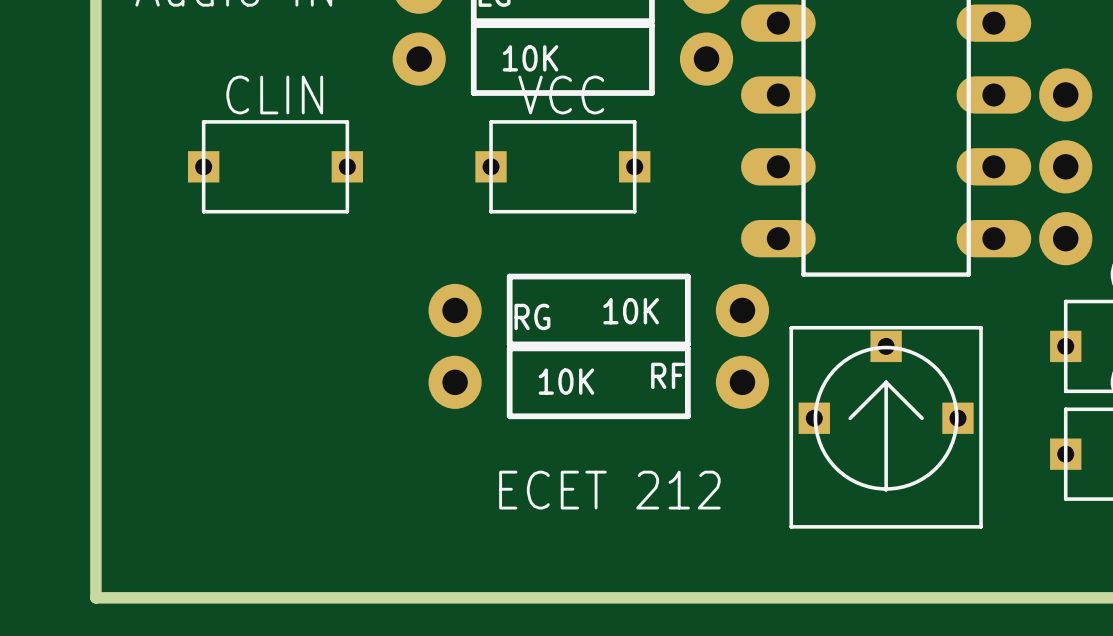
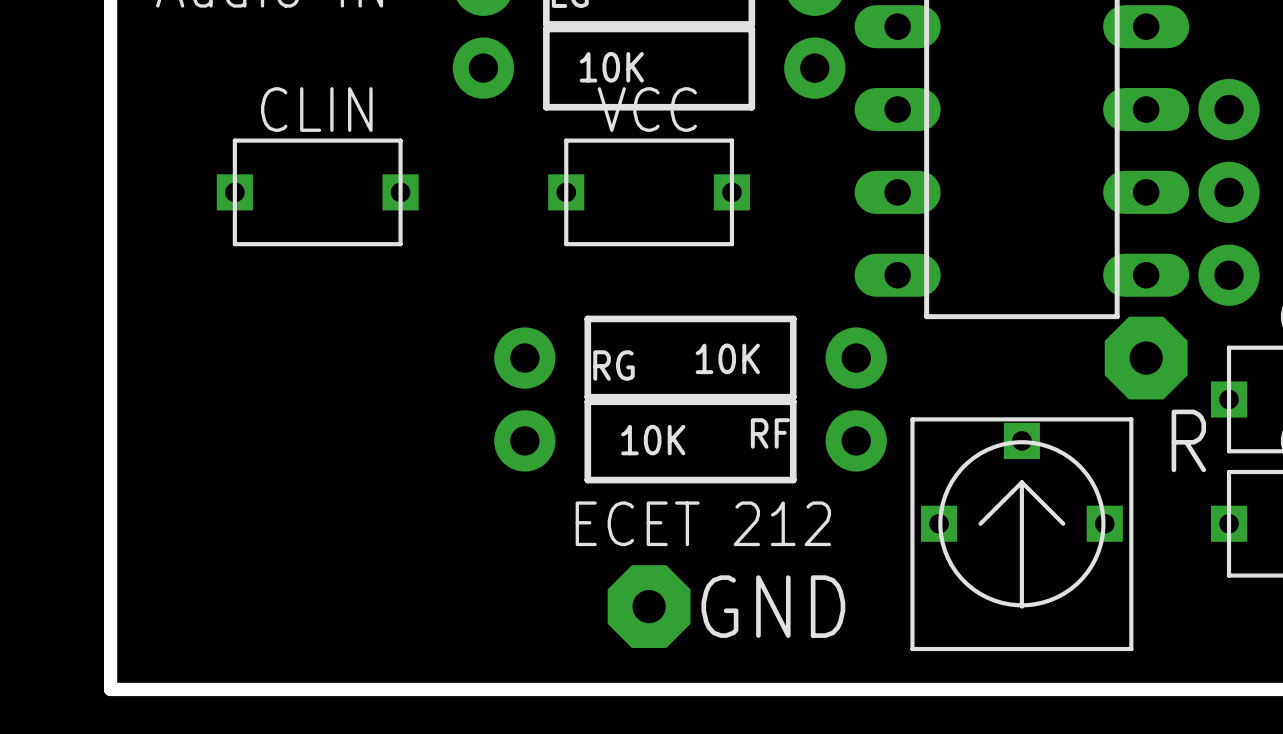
part: none -> (1146, 358)
text: none -> R (1188, 440)
part position: (886, 427) -> (1021, 534)
text position: ECET 212 (609, 490) -> ECET 212 (703, 523)
part: none -> (649, 606)
text: none -> GND (773, 606)

